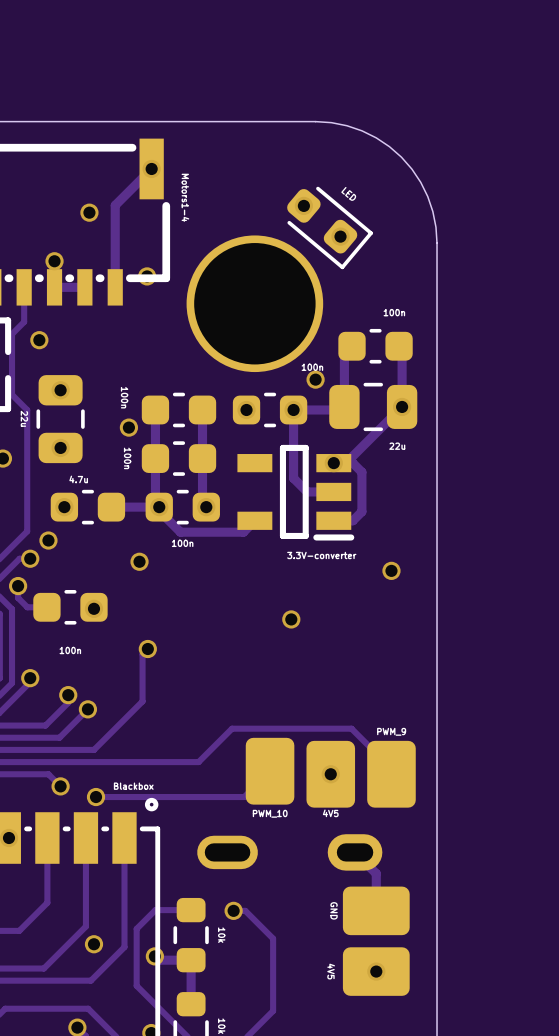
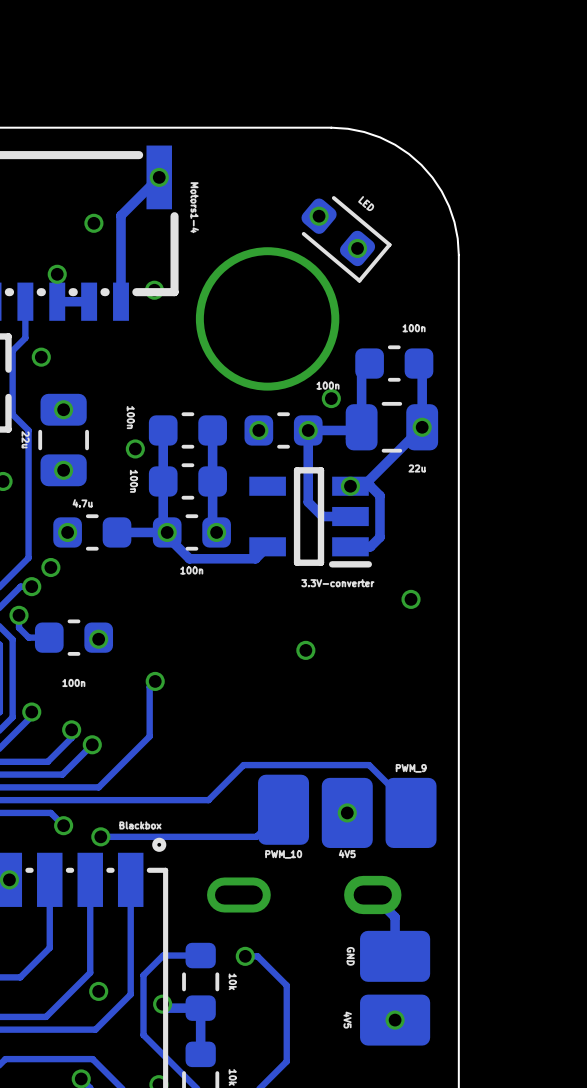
via: (139, 561) -> none

